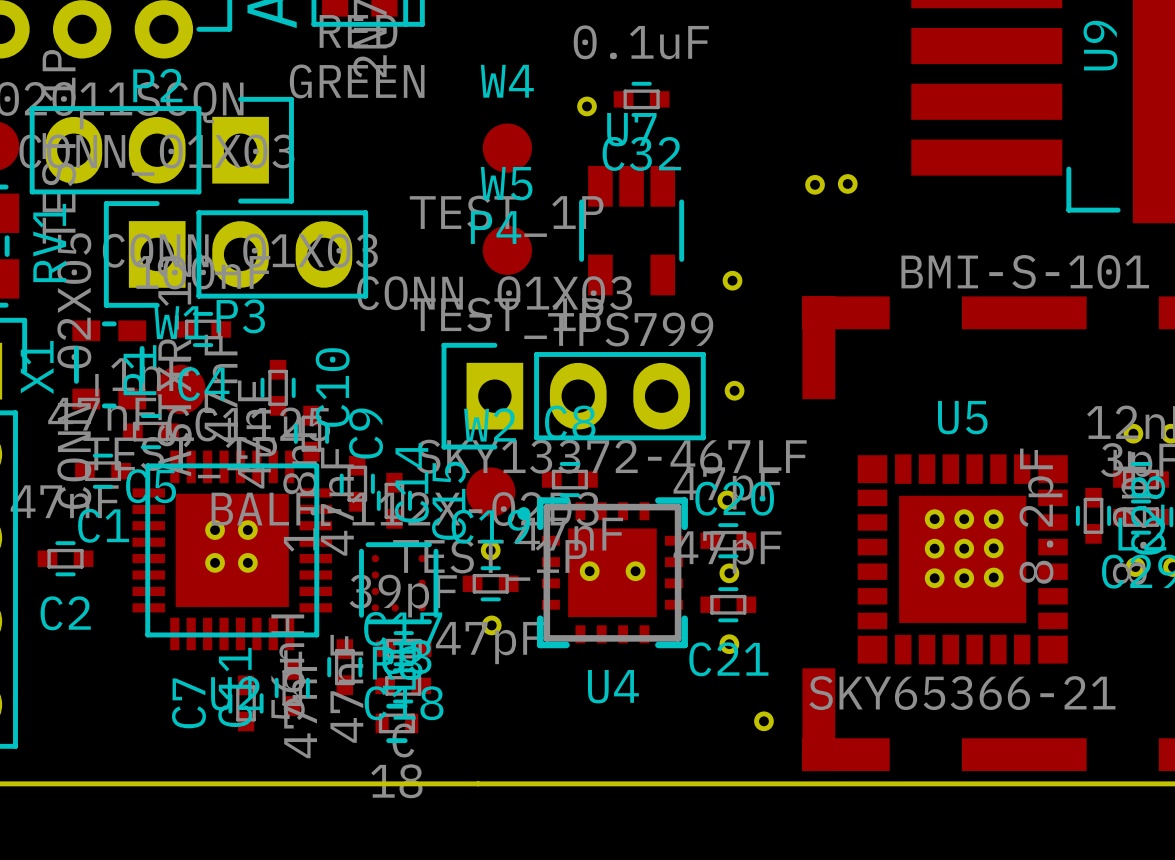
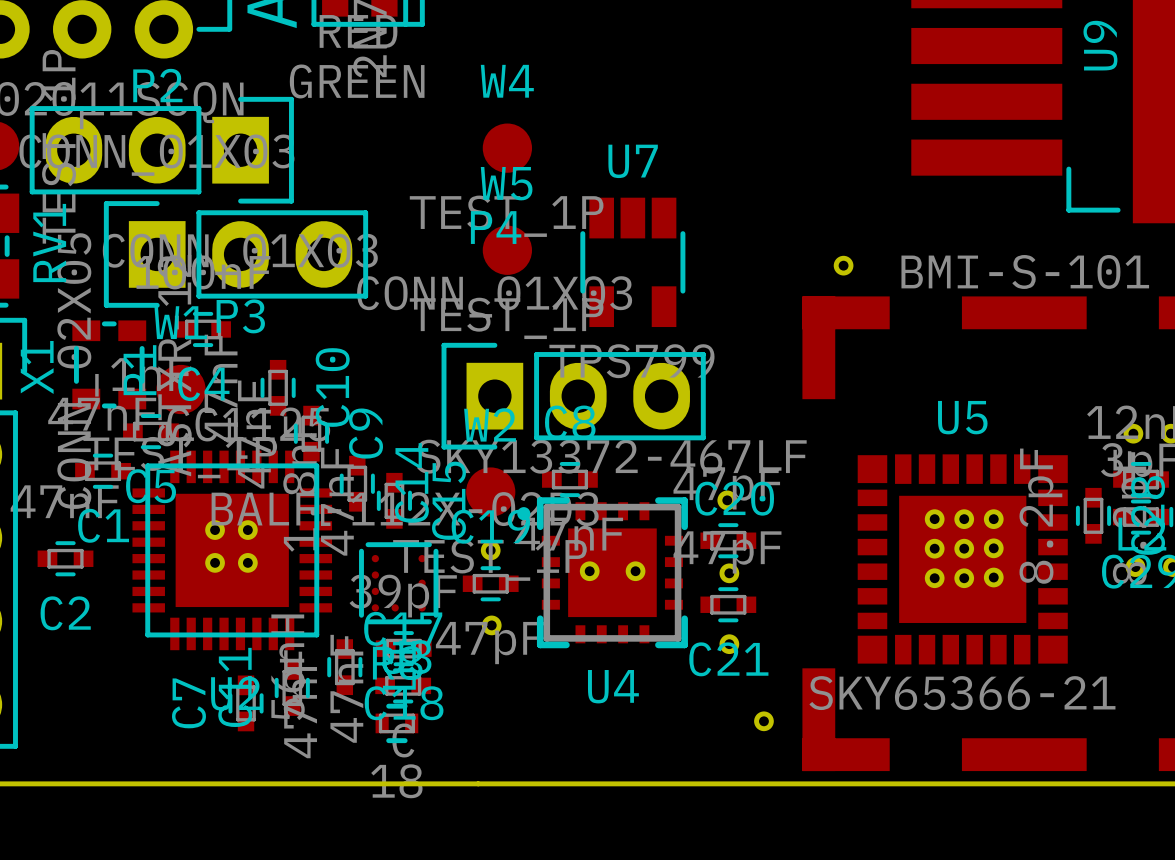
C32: 0.1uF (641, 99) -> none
part: (587, 106) -> none
part: (847, 183) -> none
part: (815, 184) -> none
U7 position: (631, 230) -> (632, 262)
part: none -> (843, 265)
part: (732, 280) -> none
part: (734, 390) -> none

